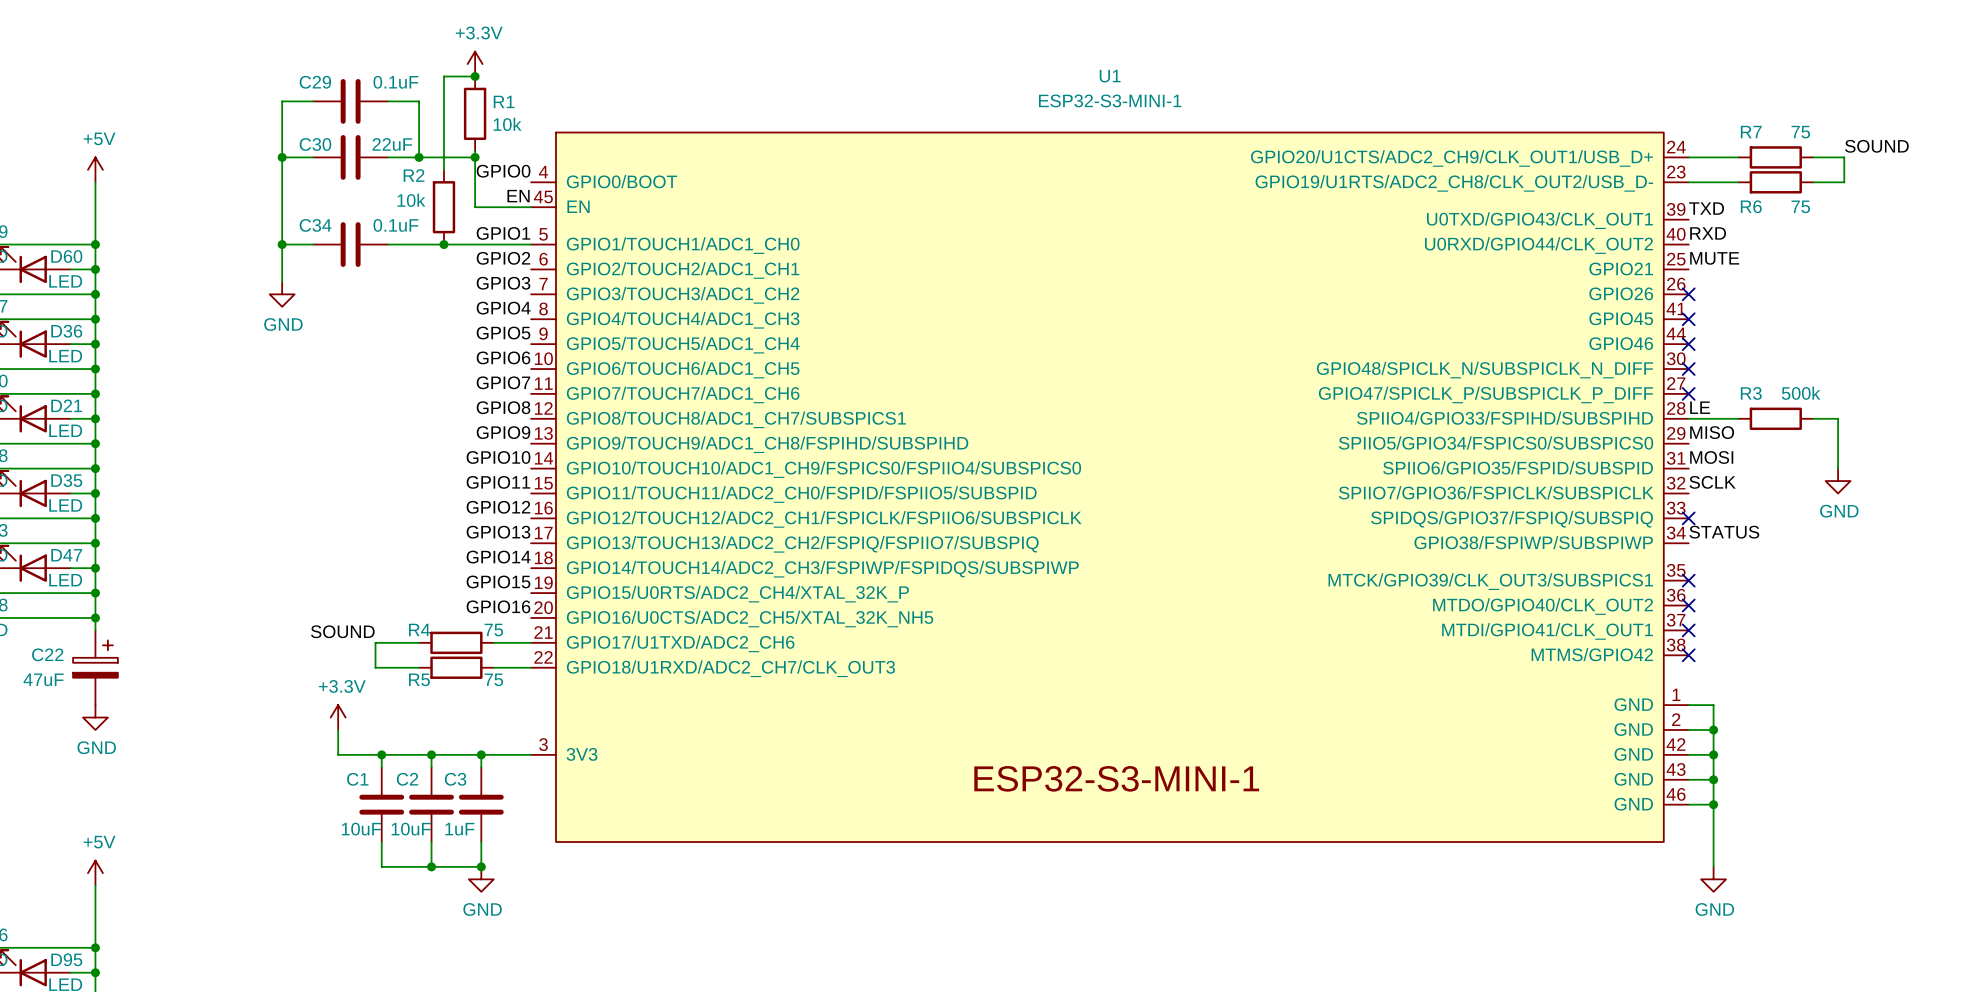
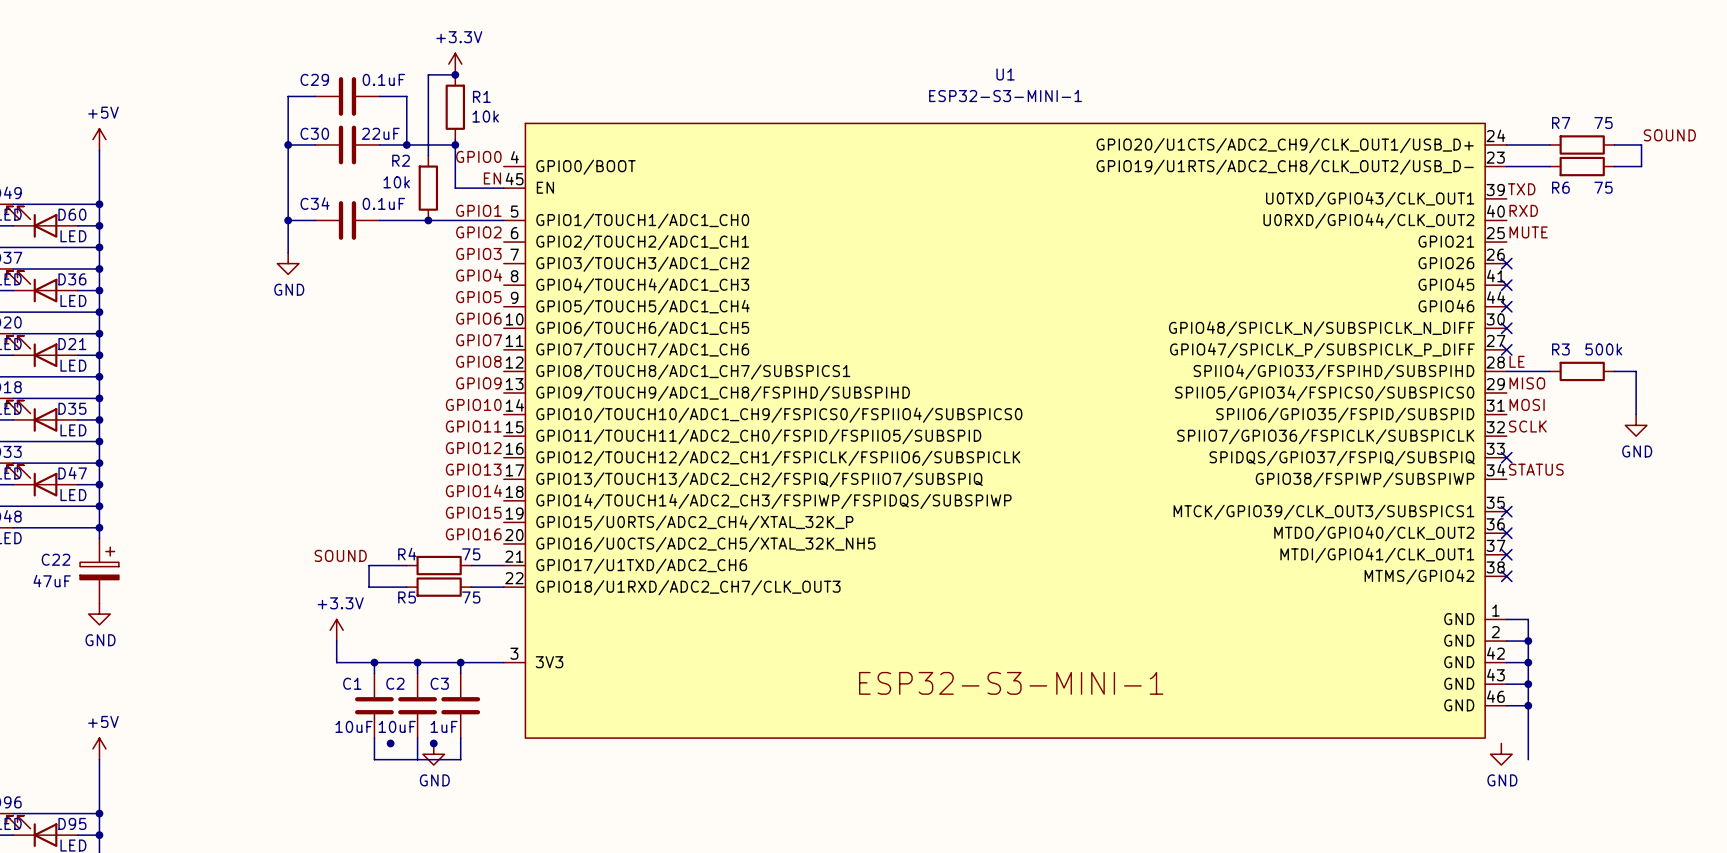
power symbol position: +3.3V (475, 64) -> +3.3V (455, 64)
wire: (475, 76) (443, 76) (443, 169) -> none
junction: (475, 76) -> none
wire: none -> (455, 74) (428, 74) (428, 123)
junction: none -> (455, 74)
wire: (313, 101) (282, 101) (282, 281) -> (315, 96) (288, 96) (288, 252)
C29 position: (350, 101) -> (347, 96)
wire: (387, 101) (419, 101) (419, 157) -> (379, 96) (406, 96) (406, 144)
R1 position: (475, 113) -> (455, 107)
label position: SOUND (1876, 146) -> SOUND (1669, 135)
wire: (282, 157) (313, 157) -> (288, 144) (315, 144)
junction position: (282, 157) -> (288, 144)
C30 position: (350, 157) -> (347, 144)
wire: (387, 157) (475, 157) -> (379, 144) (455, 144)
junction: (419, 157) -> none
junction: (475, 157) -> none
wire: (1688, 157) (1738, 157) -> (1506, 144) (1549, 144)
R7 position: (1775, 157) -> (1582, 144)
wire: (1813, 157) (1844, 157) (1844, 182) (1813, 182) -> (1614, 144) (1641, 144) (1641, 166) (1614, 166)
wire: none -> (455, 139) (455, 188) (503, 188)
label position: GPIO0 (503, 171) -> GPIO0 (478, 156)
junction: none -> (406, 144)
junction: none -> (455, 144)
wire: (1688, 182) (1738, 182) -> (1506, 166) (1549, 166)
R6 position: (1775, 182) -> (1582, 166)
wire: (475, 188) (475, 207) (531, 207) -> none
label position: EN (518, 196) -> EN (492, 178)
R2 position: (443, 207) -> (428, 188)
label position: TXD (1706, 208) -> TXD (1521, 189)
label position: GPIO1 (503, 233) -> GPIO1 (478, 210)
label position: RXD (1708, 233) -> RXD (1523, 210)
wire: (282, 244) (313, 244) -> (288, 220) (315, 220)
junction position: (282, 244) -> (288, 220)
C34 position: (350, 244) -> (347, 220)
wire: (387, 244) (531, 244) -> (379, 220) (503, 220)
junction: (443, 244) -> none
label position: GPIO2 (503, 258) -> GPIO2 (478, 232)
label position: MUTE (1714, 258) -> MUTE (1528, 232)
junction: none -> (428, 220)
label position: GPIO3 (503, 283) -> GPIO3 (478, 253)
power symbol position: GND (282, 294) -> GND (288, 263)
no-connect mark: (1688, 294) -> none
label position: GPIO4 (503, 308) -> GPIO4 (479, 275)
no-connect mark: none -> (1506, 263)
no-connect mark: (1688, 319) -> none
label position: GPIO5 (503, 333) -> GPIO5 (478, 297)
no-connect mark: none -> (1506, 285)
no-connect mark: (1688, 344) -> none
label position: GPIO6 (503, 357) -> GPIO6 (478, 318)
no-connect mark: none -> (1506, 306)
no-connect mark: (1688, 369) -> none
label position: GPIO7 (503, 382) -> GPIO7 (479, 340)
no-connect mark: none -> (1506, 328)
no-connect mark: (1688, 393) -> none
label position: GPIO8 (503, 407) -> GPIO8 (478, 361)
label position: LE (1700, 407) -> LE (1517, 361)
no-connect mark: none -> (1506, 349)
wire: (1688, 418) (1738, 418) -> (1506, 371) (1549, 371)
R3 position: (1775, 418) -> (1582, 371)
wire: (1813, 418) (1838, 418) (1838, 468) -> (1614, 371) (1636, 371) (1636, 414)
label position: GPIO9 (503, 432) -> GPIO9 (478, 383)
label position: MISO (1712, 432) -> MISO (1527, 383)
label position: GPIO10 (498, 457) -> GPIO10 (473, 404)
label position: MOSI (1711, 457) -> MOSI (1527, 404)
power symbol position: GND (1838, 481) -> GND (1636, 425)
label position: GPIO11 (498, 482) -> GPIO11 (473, 426)
label position: SCLK (1712, 482) -> SCLK (1527, 426)
U1 position: (1109, 487) -> (1005, 430)
label position: GPIO12 (498, 507) -> GPIO12 (473, 448)
no-connect mark: (1688, 518) -> none
label position: GPIO13 (498, 532) -> GPIO13 (473, 469)
label position: STATUS (1724, 532) -> STATUS (1536, 469)
no-connect mark: none -> (1506, 457)
label position: GPIO14 (498, 557) -> GPIO14 (473, 490)
no-connect mark: (1688, 580) -> none
label position: GPIO15 (498, 581) -> GPIO15 (473, 512)
no-connect mark: none -> (1506, 511)
no-connect mark: (1688, 605) -> none
label position: GPIO16 (498, 606) -> GPIO16 (473, 534)
no-connect mark: none -> (1506, 533)
no-connect mark: (1688, 630) -> none
label position: SOUND (342, 631) -> SOUND (340, 555)
wire: (419, 642) (375, 642) (375, 667) (419, 667) -> (406, 565) (369, 565) (369, 587) (406, 587)
R4 position: (456, 642) -> (439, 565)
wire: (493, 642) (531, 642) -> (471, 565) (503, 565)
no-connect mark: none -> (1506, 554)
no-connect mark: (1688, 655) -> none
R5 position: (456, 667) -> (439, 587)
wire: (493, 667) (531, 667) -> (471, 587) (503, 587)
no-connect mark: none -> (1506, 576)
wire: (1688, 705) (1713, 705) (1713, 866) -> (1506, 619) (1528, 619) (1528, 759)
power symbol position: +3.3V (338, 717) -> +3.3V (336, 630)
wire: (338, 729) (338, 754) (531, 754) -> (336, 641) (336, 662) (503, 662)
wire: (1688, 729) (1713, 729) -> (1506, 641) (1528, 641)
junction: (1713, 729) -> none
junction: none -> (1528, 641)
wire: (381, 754) (381, 767) -> (374, 662) (374, 673)
junction: (381, 754) -> none
wire: (431, 754) (431, 767) -> (417, 662) (417, 673)
junction: (431, 754) -> none
wire: (481, 754) (481, 767) -> (460, 662) (460, 673)
junction: (481, 754) -> none
wire: (1688, 754) (1713, 754) -> (1506, 662) (1528, 662)
junction: (1713, 754) -> none
junction: none -> (374, 662)
junction: none -> (417, 662)
junction: none -> (460, 662)
junction: none -> (1528, 662)
wire: (1688, 779) (1713, 779) -> (1506, 684) (1528, 684)
junction: (1713, 779) -> none
junction: none -> (1528, 684)
C1 position: (381, 804) -> (374, 705)
C2 position: (431, 804) -> (417, 705)
C3 position: (481, 804) -> (460, 705)
wire: (1688, 804) (1713, 804) -> (1506, 705) (1528, 705)
junction: (1713, 804) -> none
junction: none -> (1528, 705)
wire: (381, 842) (381, 866) (481, 866) (481, 842) -> (374, 738) (374, 759) (460, 759) (460, 738)
wire: (431, 842) (431, 866) -> (417, 738) (417, 759)

